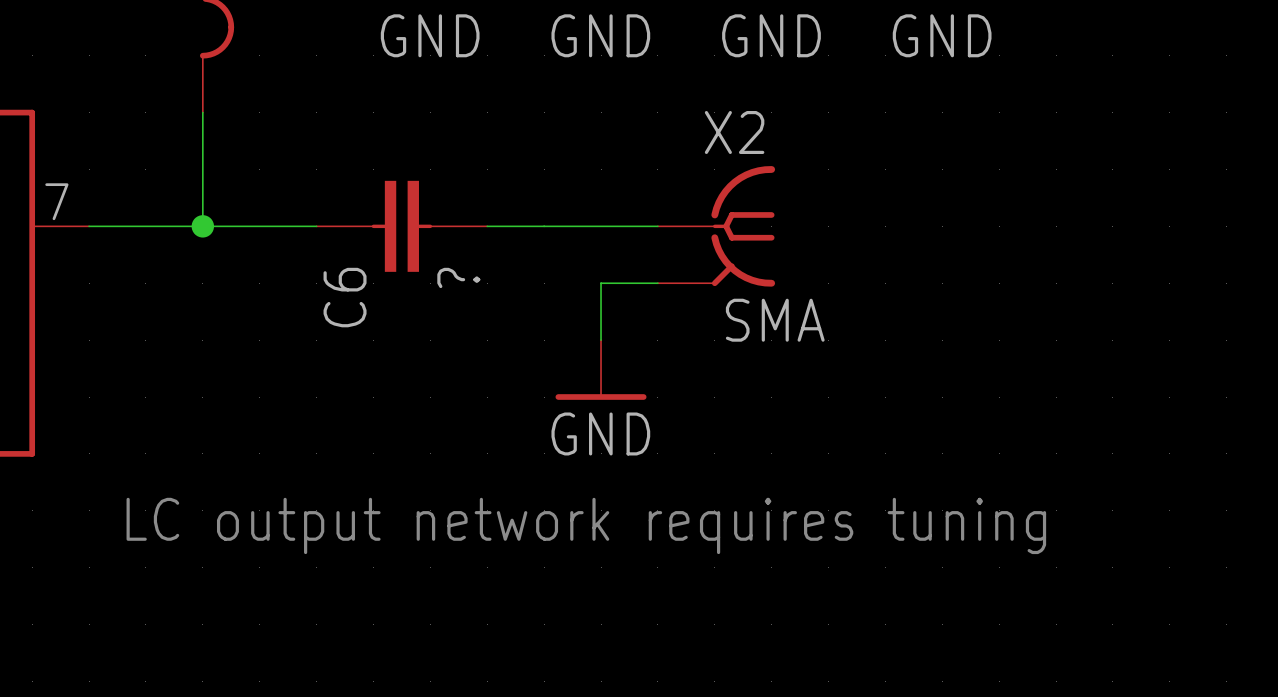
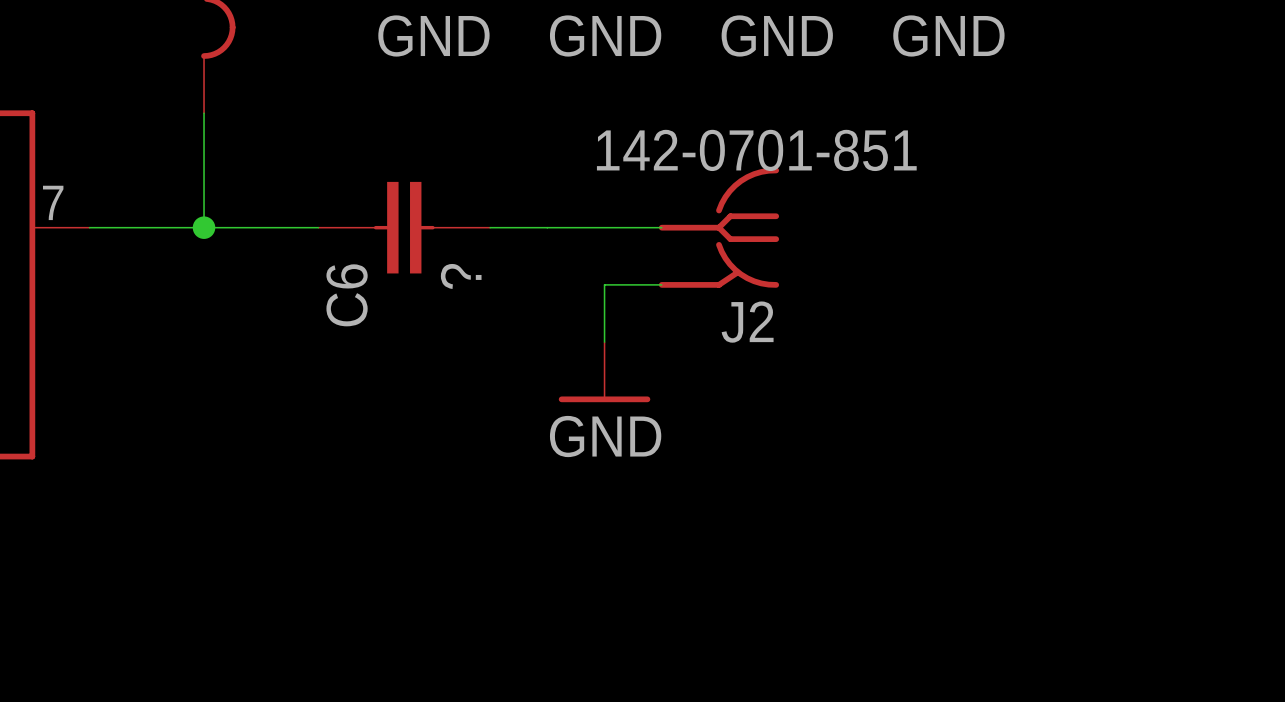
J2: none -> 142-0701-851 (718, 227)
X2: SMA (716, 226) -> none
text: LC output network requires tuning (586, 525) -> none

